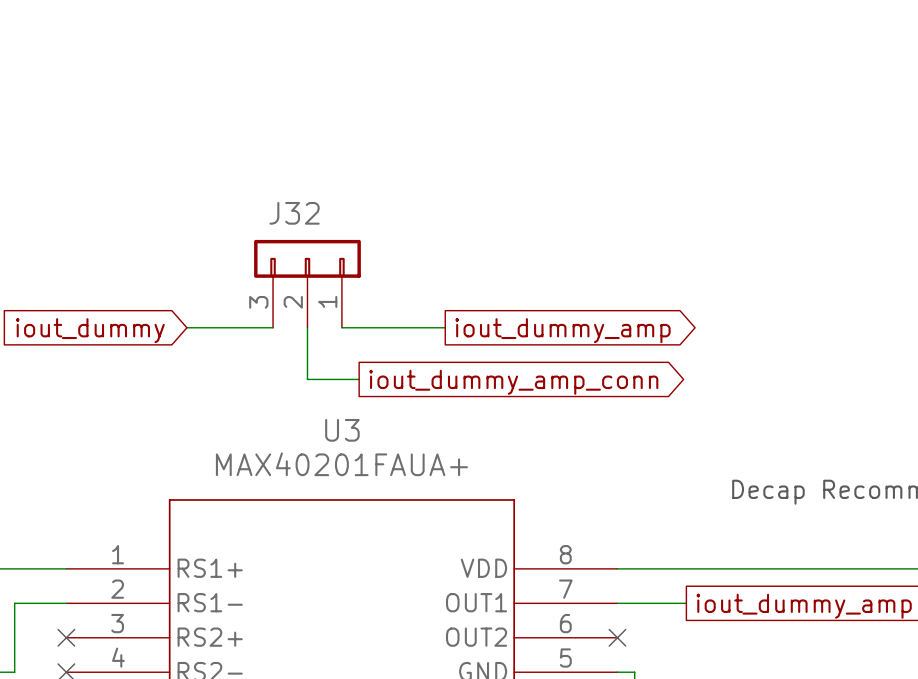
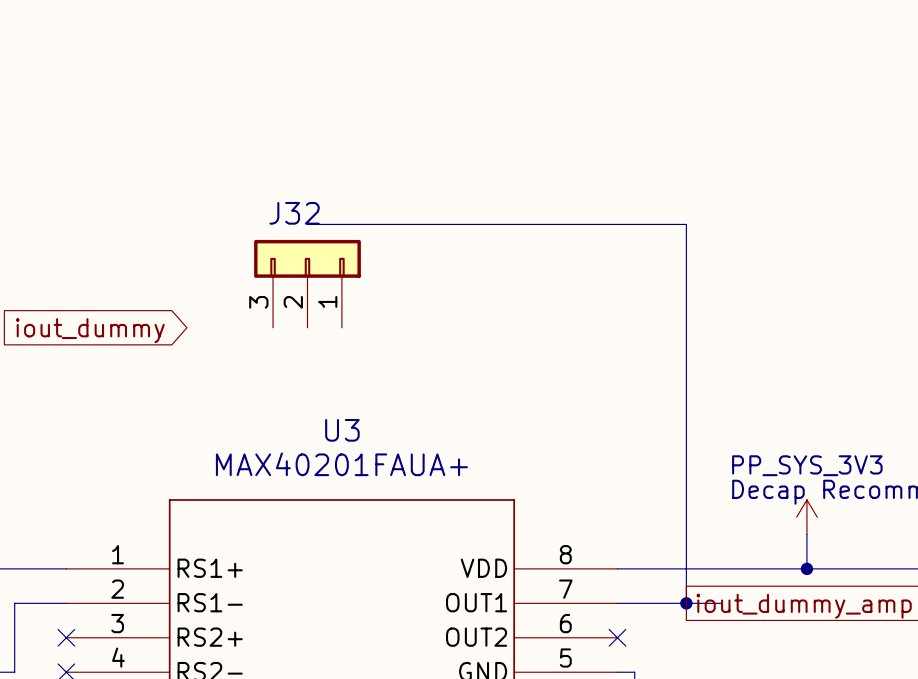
wire: none -> (307, 224) (686, 224) (686, 603) (720, 603)
wire: (186, 327) (273, 327) -> none
wire: (307, 327) (307, 379) (359, 379) -> none
wire: (341, 327) (445, 327) -> none
global label: iout_dummy_amp (562, 330) -> none
global label: iout_dummy_amp_conn (513, 382) -> none
power symbol: none -> PP_SYS_3V3 (806, 517)
wire: none -> (806, 534) (806, 568)
junction: none -> (806, 568)
junction: none -> (686, 603)

